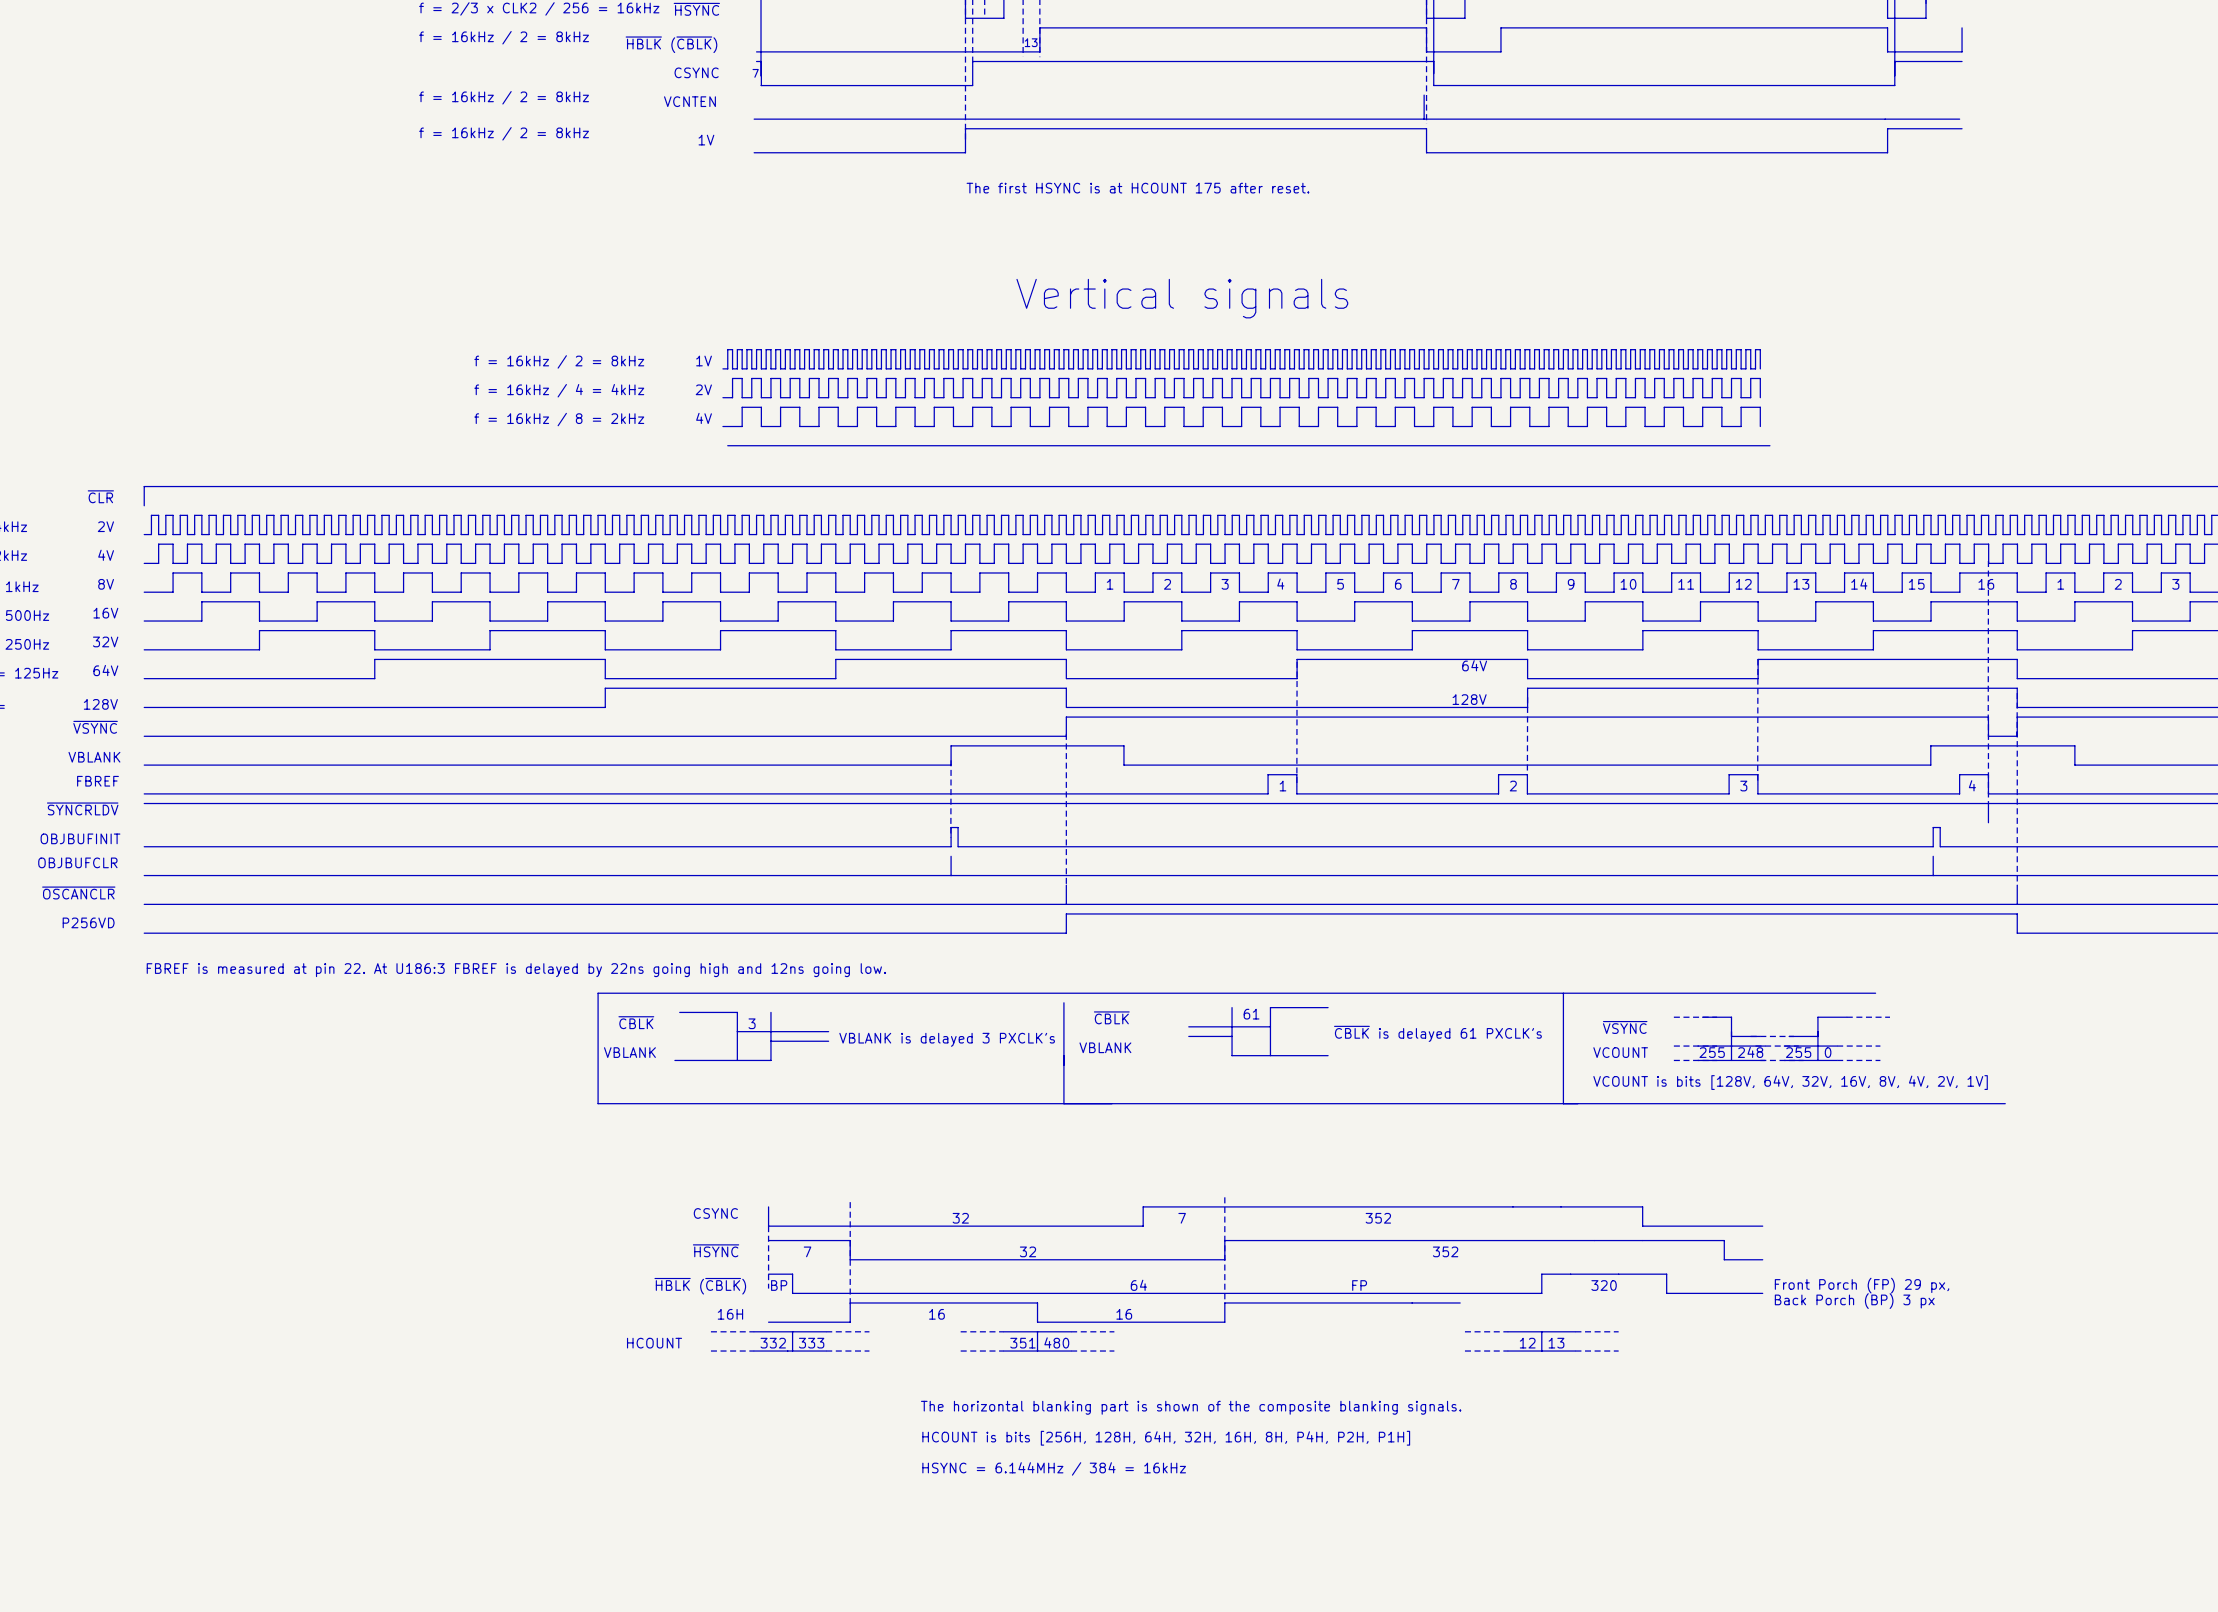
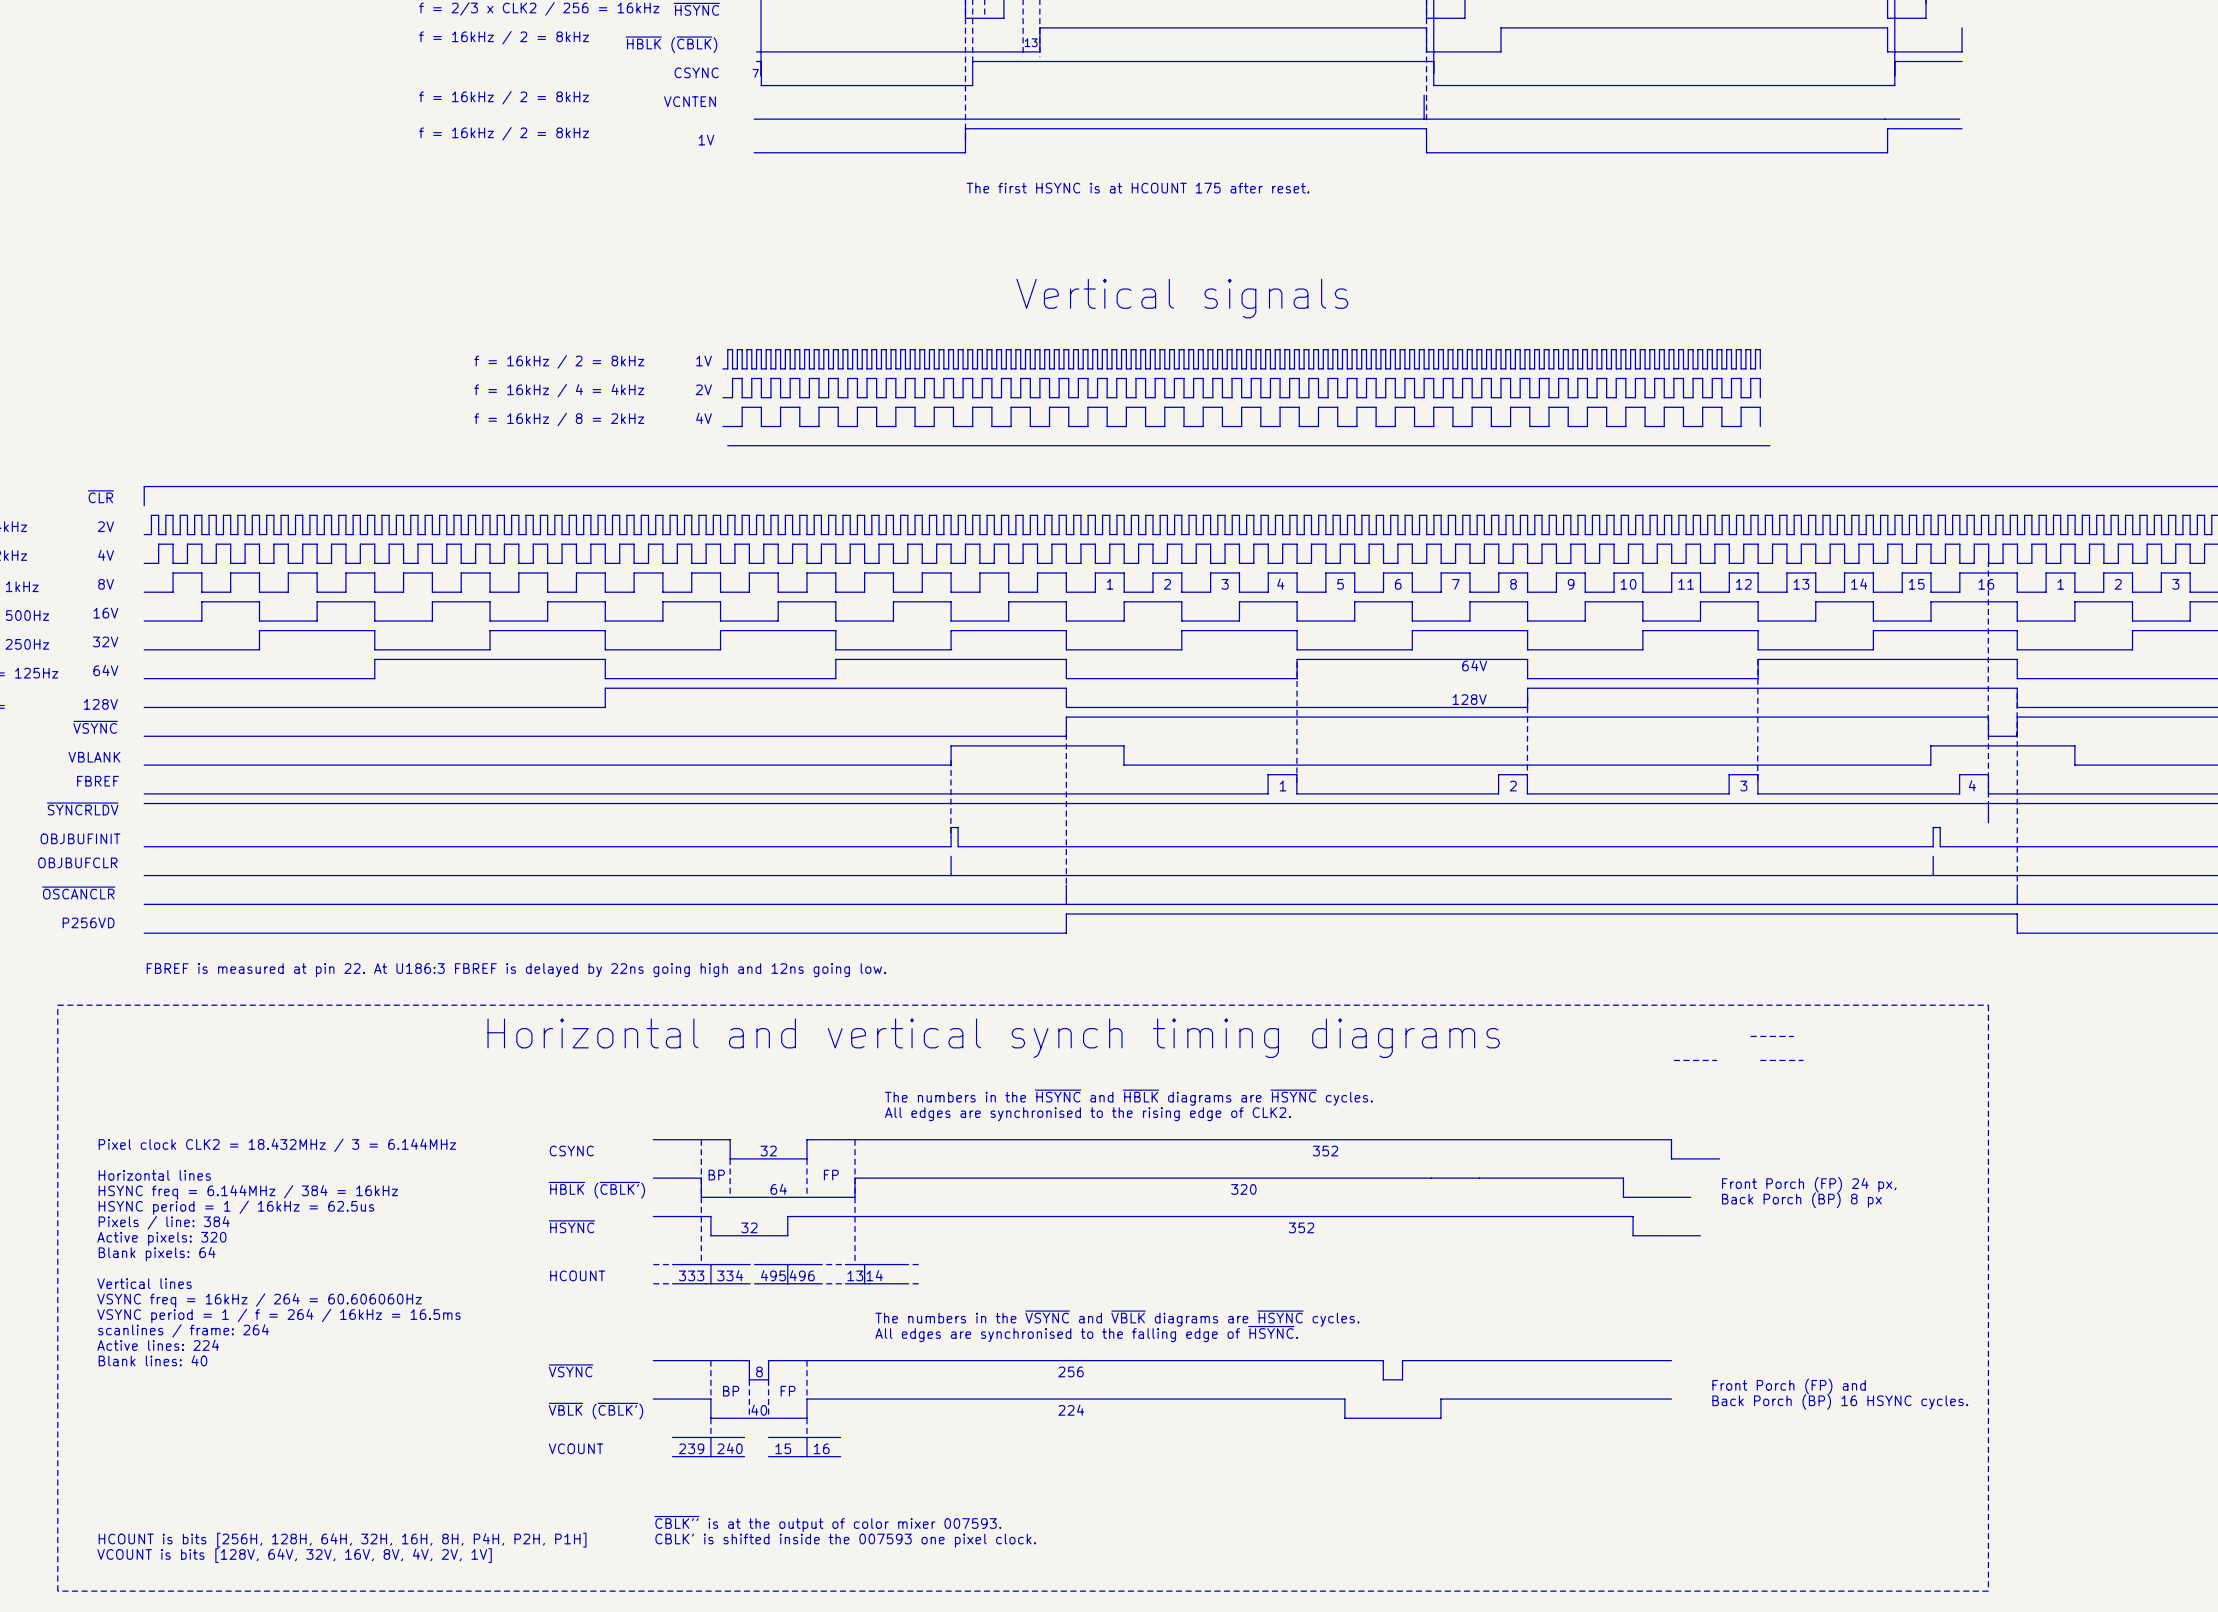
line: (1563, 993) (1563, 1103) -> none
line: (1875, 993) (598, 993) (598, 1103) (2005, 1103) -> none
line: (1063, 1002) (1063, 1103) -> none
line: none -> (57, 1005) (1988, 1005) (1988, 1591) (57, 1591) (57, 1005)
line: (1232, 1007) (1232, 1055) (1328, 1055) -> none
line: (1328, 1007) (1270, 1007) (1270, 1055) -> none
line: (679, 1012) (737, 1012) (737, 1060) -> none
line: (770, 1012) (770, 1060) (674, 1060) -> none
text: 61 (1251, 1014) -> none
text: ~{CBLK} (1111, 1017) -> none
line: (1673, 1017) (1717, 1017) -> none
line: (1702, 1017) (1731, 1017) (1731, 1060) -> none
line: (1889, 1017) (1817, 1017) (1817, 1060) -> none
text: ~{CBLK} (636, 1022) -> none
text: 3 (752, 1023) -> none
line: (1188, 1026) (1270, 1026) -> none
text: ~{VSYNC} (1625, 1027) -> none
line: (737, 1031) (828, 1031) -> none
text: ~{CBLK} is delayed 61 PXCLK's (1437, 1033) -> none
line: (1188, 1036) (1232, 1036) -> none
line: (1731, 1036) (1760, 1036) -> none
line: (1789, 1036) (1817, 1036) -> none
text: none -> Horizontal and vertical synch timing diagrams (993, 1038)
text: VBLANK is delayed 3 PXCLK's (947, 1039) -> none
line: (770, 1041) (828, 1041) -> none
line: (1673, 1046) (1717, 1046) -> none
line: (1697, 1046) (1765, 1046) -> none
line: (1755, 1046) (1798, 1046) -> none
line: (1784, 1046) (1880, 1046) -> none
text: VBLANK (1105, 1047) -> none
text: VBLANK (629, 1052) -> none
text: VCOUNT (1620, 1052) -> none
text: 255 (1712, 1052) -> none
text: 248 (1750, 1052) -> none
text: 255 (1798, 1052) -> none
text: 0 (1828, 1052) -> none
line: (1697, 1060) (1765, 1060) -> none
line: (1784, 1060) (1880, 1060) -> none
text: VCOUNT is bits [128V, 64V, 32V, 16V, 8V, 4V, 2V, 1V] (1790, 1082) -> none
text: none -> The numbers in the ~{HSYNC} and ~{HBLK} diagrams are ~{HSYNC} cycles. (1128, 1097)
text: none -> All edges are synchronised to the rising edge of CLK2. (1087, 1114)
line: none -> (653, 1139) (730, 1139) (730, 1158)
line: none -> (701, 1139) (701, 1264)
line: none -> (855, 1139) (855, 1264)
text: none -> Pixel clock CLK2 = 18.432MHz / 3 = 6.144MHz (277, 1145)
text: none -> 32 (768, 1151)
text: none -> 352 (1325, 1151)
line: none -> (730, 1158) (806, 1158)
line: none -> (730, 1158) (730, 1197)
line: none -> (806, 1158) (806, 1139) (1671, 1139) (1671, 1158) (1719, 1158)
line: none -> (806, 1158) (806, 1197)
text: none -> Horizontal lines (154, 1175)
text: none -> BP (716, 1175)
text: none -> FP (831, 1175)
line: none -> (653, 1178) (701, 1178) (701, 1197) (855, 1197) (855, 1178) (1623, 1178) (1623, 1197) (1690, 1197)
text: none -> Front Porch (FP) 24 px, (1809, 1184)
text: none -> 64 (778, 1189)
text: none -> 320 (1243, 1189)
text: none -> ~{HBLK} (~{CBLK'}) (596, 1190)
text: none -> HSYNC freq = 6.144MHz / 384 = 16kHz (248, 1192)
line: (1224, 1197) (1224, 1302) -> none
text: none -> Back Porch (BP) 8 px (1801, 1200)
line: (850, 1202) (850, 1307) -> none
line: (768, 1206) (768, 1226) -> (787, 1264) (787, 1283)
text: none -> HSYNC period = 1 / 16kHz = 62.5us (236, 1207)
text position: CSYNC (715, 1213) -> CSYNC (571, 1151)
line: none -> (653, 1216) (710, 1216) (710, 1235) (787, 1235) (787, 1216) (1633, 1216) (1633, 1235) (1700, 1235)
text: 32 (960, 1218) -> none
text: 7 (1182, 1218) -> none
text: 352 (1378, 1218) -> none
text: none -> Pixels / line: 384 (164, 1222)
line: (768, 1226) (1143, 1226) (1143, 1206) (1642, 1206) (1642, 1226) (1762, 1226) -> none
line: (768, 1226) (768, 1288) -> none
text: none -> 32 (749, 1227)
text: none -> 352 (1301, 1227)
text: none -> Active pixels: 320 (161, 1238)
line: (768, 1240) (850, 1240) (850, 1259) (1224, 1259) (1224, 1240) (1724, 1240) (1724, 1259) (1762, 1259) -> none
text position: ~{HSYNC} (716, 1250) -> ~{HSYNC} (571, 1226)
text: 7 (807, 1251) -> none
text: 32 (1027, 1251) -> none
text: 352 (1445, 1251) -> none
text: none -> Blank pixels: 64 (157, 1254)
line: none -> (653, 1264) (922, 1264)
line: none -> (710, 1264) (710, 1283)
line: (768, 1274) (792, 1274) (792, 1293) (1541, 1293) (1541, 1274) (1666, 1274) (1666, 1293) (1762, 1293) -> none
text: none -> 334 (730, 1275)
text: none -> 495 (773, 1275)
text: none -> 496 (802, 1275)
text: none -> 13 (855, 1275)
text: none -> 14 (874, 1275)
text: none -> Vertical lines (144, 1283)
line: none -> (653, 1283) (922, 1283)
text: BP (779, 1285) -> none
text: 64 (1138, 1285) -> none
text: FP (1359, 1285) -> none
text: 320 (1604, 1285) -> none
text: Front Porch (FP) 29 px, (1862, 1285) -> none
text: ~{HBLK} (~{CBLK}) (700, 1286) -> none
text: none -> VSYNC freq = 16kHz / 264 = 60.606060Hz (259, 1300)
text: Back Porch (BP) 3 px (1854, 1301) -> none
line: (1224, 1302) (1460, 1302) -> none
line: (1224, 1302) (1224, 1322) (1037, 1322) (1037, 1302) (850, 1302) (850, 1322) (768, 1322) -> none
text: 16H (730, 1314) -> none
text: 16 (936, 1314) -> none
text: 16 (1124, 1314) -> none
text: none -> VSYNC period = 1 / f = 264 / 16kHz = 16.5ms (279, 1315)
text: none -> The numbers in the ~{VSYNC} and ~{VBLK} diagrams are ~{HSYNC} cycles. (1117, 1318)
text: none -> scanlines / frame: 264 (183, 1330)
line: (710, 1331) (869, 1331) -> none
line: (792, 1331) (792, 1351) -> (806, 1399) (806, 1418)
line: (960, 1331) (1114, 1331) -> none
line: (1037, 1331) (1037, 1351) -> (864, 1264) (864, 1283)
line: (1464, 1331) (1618, 1331) -> none
line: (1541, 1331) (1541, 1351) -> none
text: none -> All edges are synchronised to the falling edge of ~{HSYNC}. (1086, 1334)
text: 480 (1056, 1342) -> none
text position: HCOUNT (654, 1343) -> HCOUNT (577, 1275)
text: 332 (773, 1343) -> none
text position: 333 (811, 1343) -> 333 (691, 1275)
text: 351 (1022, 1343) -> none
text: 12 (1527, 1343) -> none
text: 13 (1556, 1343) -> none
text: none -> Active lines: 224 (158, 1345)
line: (710, 1351) (869, 1351) -> none
line: (960, 1351) (1114, 1351) -> none
line: (1464, 1351) (1618, 1351) -> none
text: none -> Blank lines: 40 (152, 1360)
line: none -> (653, 1360) (749, 1360) (749, 1379)
line: none -> (710, 1360) (710, 1399)
line: none -> (806, 1360) (806, 1399)
line: none -> (1671, 1360) (1402, 1360) (1402, 1379) (1383, 1379) (1383, 1360) (768, 1360) (768, 1379)
text: none -> ~{VSYNC} (571, 1370)
text: none -> 8 (759, 1371)
text: none -> 256 (1070, 1371)
line: none -> (749, 1379) (768, 1379)
line: none -> (749, 1379) (749, 1418)
line: none -> (768, 1379) (768, 1418)
text: none -> Front Porch (FP) and (1789, 1386)
text: none -> BP (731, 1391)
text: none -> FP (788, 1391)
line: none -> (653, 1399) (710, 1399)
line: none -> (710, 1399) (710, 1418)
line: none -> (806, 1399) (1344, 1399) (1344, 1418) (1440, 1418) (1440, 1399) (1671, 1399)
text: none -> Back Porch (BP) 16 HSYNC cycles. (1840, 1401)
text: The horizontal blanking part is shown of the composite blanking signals. (1191, 1407) -> none
text: none -> 40 (759, 1410)
text: none -> 224 (1071, 1410)
text: none -> ~{VBLK} (~{CBLK'}) (595, 1411)
line: none -> (710, 1418) (806, 1418)
line: none -> (710, 1418) (710, 1456)
line: none -> (806, 1418) (806, 1456)
line: none -> (672, 1437) (744, 1437)
line: none -> (768, 1437) (840, 1437)
text: HCOUNT is bits [256H, 128H, 64H, 32H, 16H, 8H, P4H, P2H, P1H] (1166, 1438) -> none
text: none -> VCOUNT (576, 1448)
text: none -> 239 (691, 1448)
text: none -> 240 (729, 1448)
text: none -> 15 (783, 1448)
text: none -> 16 (821, 1448)
line: none -> (672, 1456) (744, 1456)
line: none -> (768, 1456) (840, 1456)
text: HSYNC = 6.144MHz / 384 = 16kHz (1054, 1468) -> none
text: none -> ~{CBLK''} is at the output of color mixer 007593. (827, 1524)
text: none -> HCOUNT is bits [256H, 128H, 64H, 32H, 16H, 8H, P4H, P2H, P1H] (342, 1540)
text: none -> CBLK' is shifted inside the 007593 one pixel clock. (845, 1540)
text: none -> VCOUNT is bits [128V, 64V, 32V, 16V, 8V, 4V, 2V, 1V] (294, 1555)

